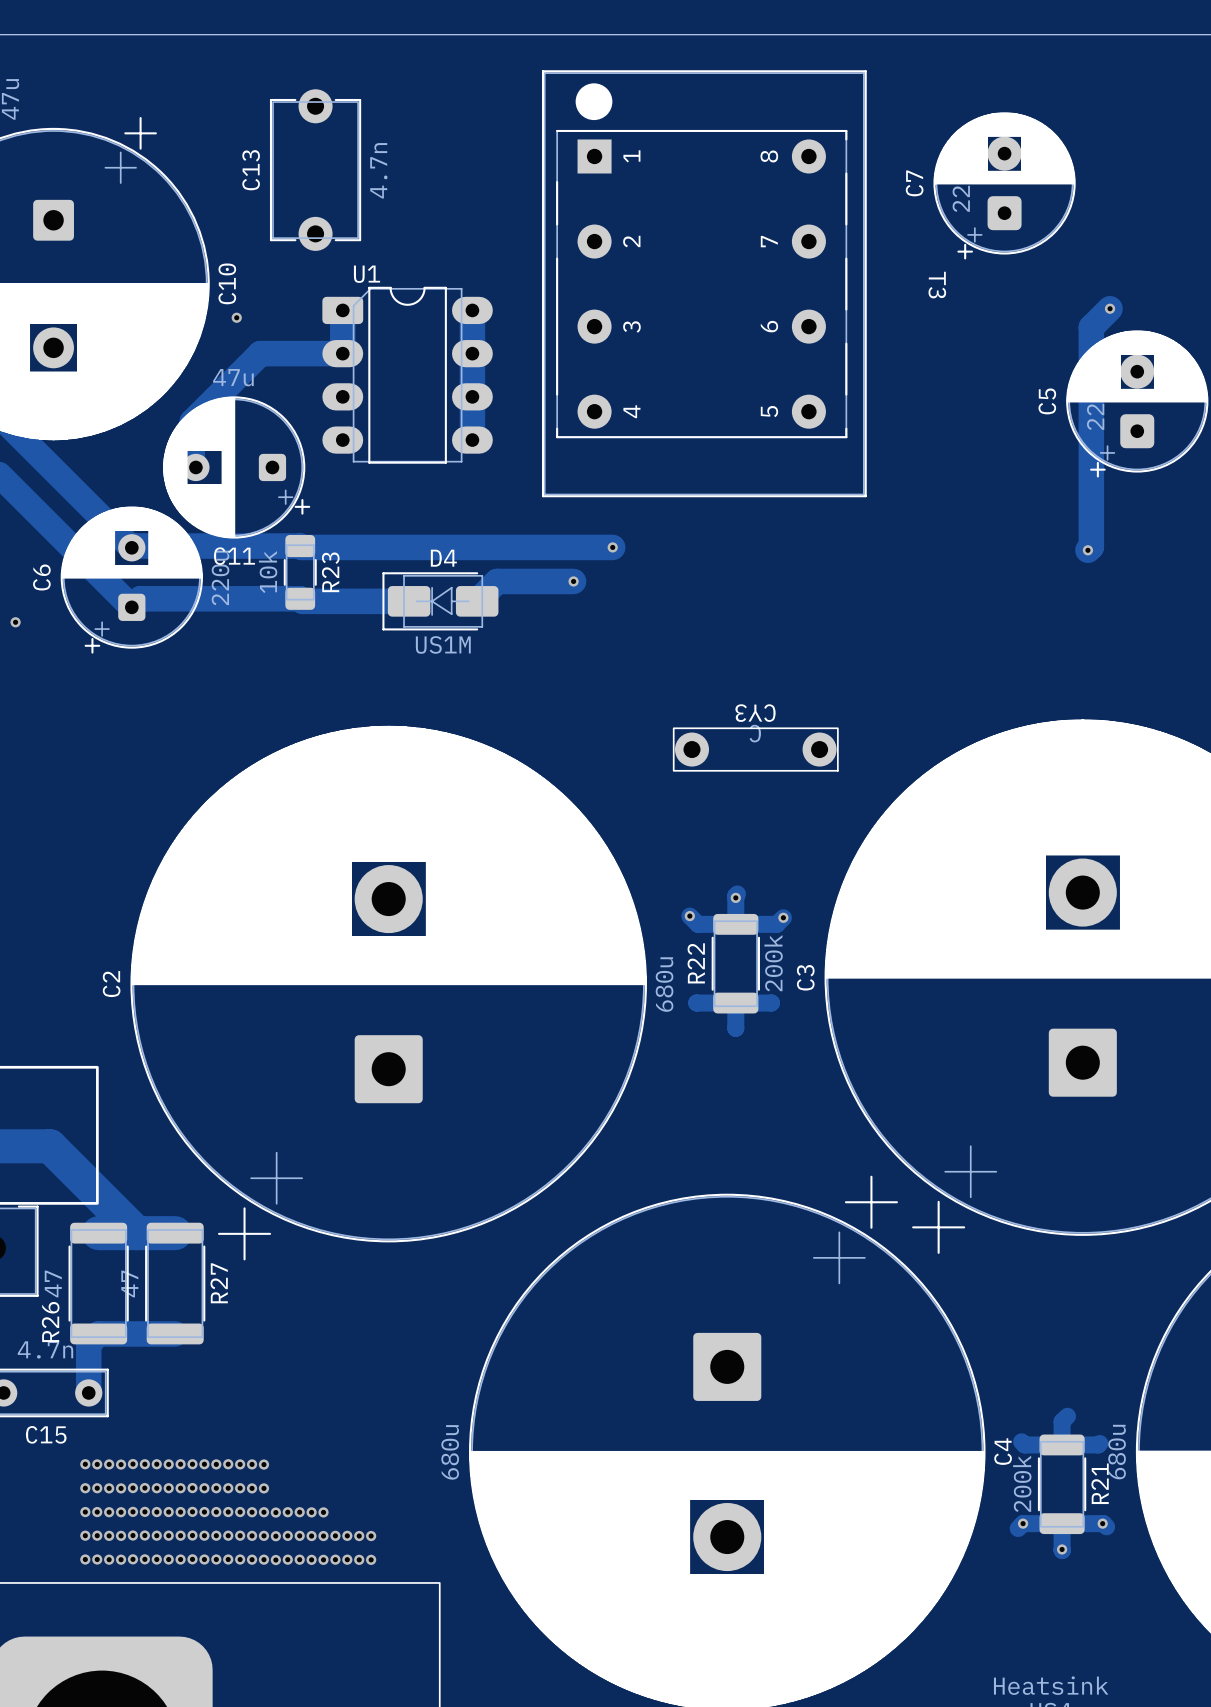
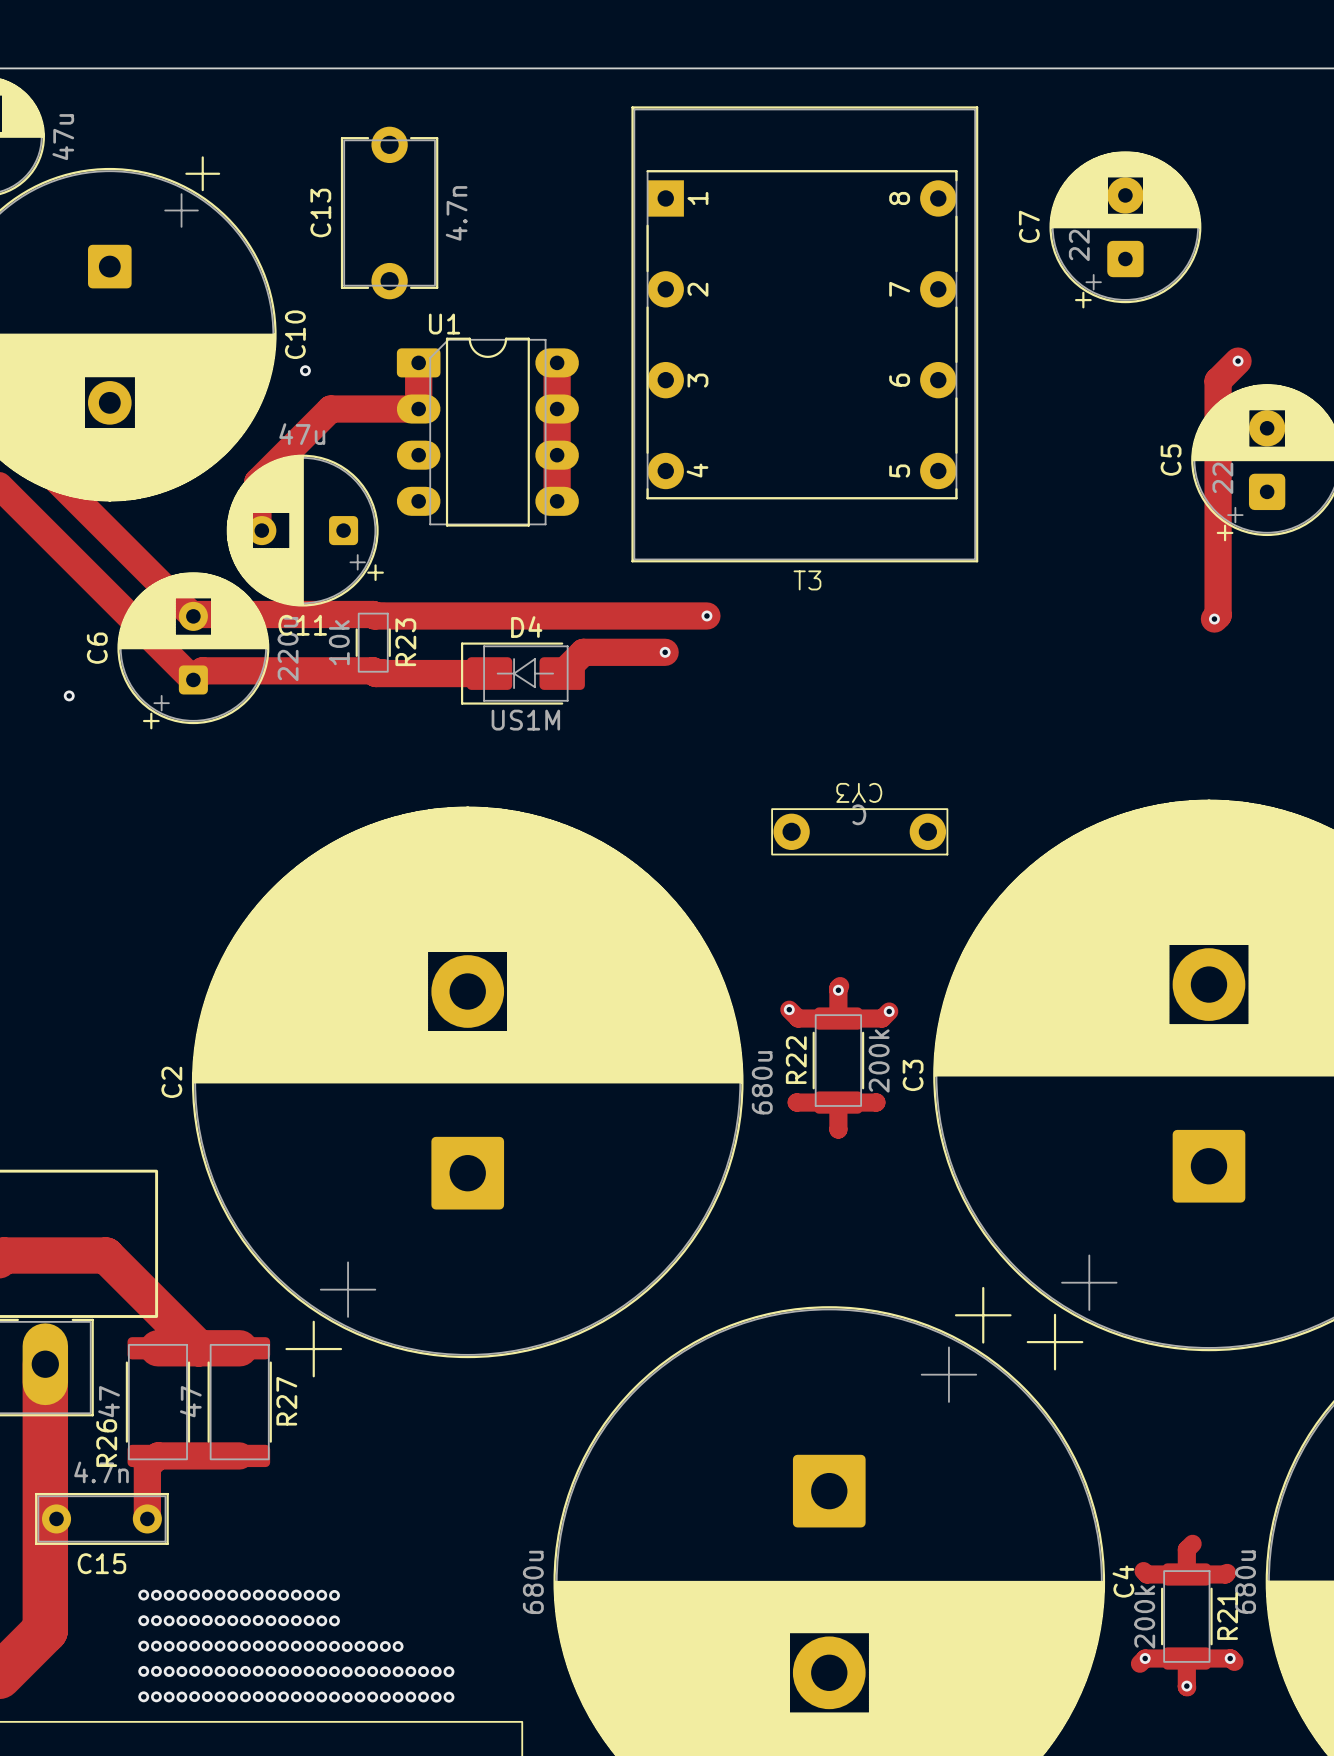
T3 footprint: [541, 70, 867, 498] -> [631, 106, 979, 563]
drawing: [575, 83, 613, 121] -> none
T3 name position: T3 (937, 285) -> T3 (807, 580)

